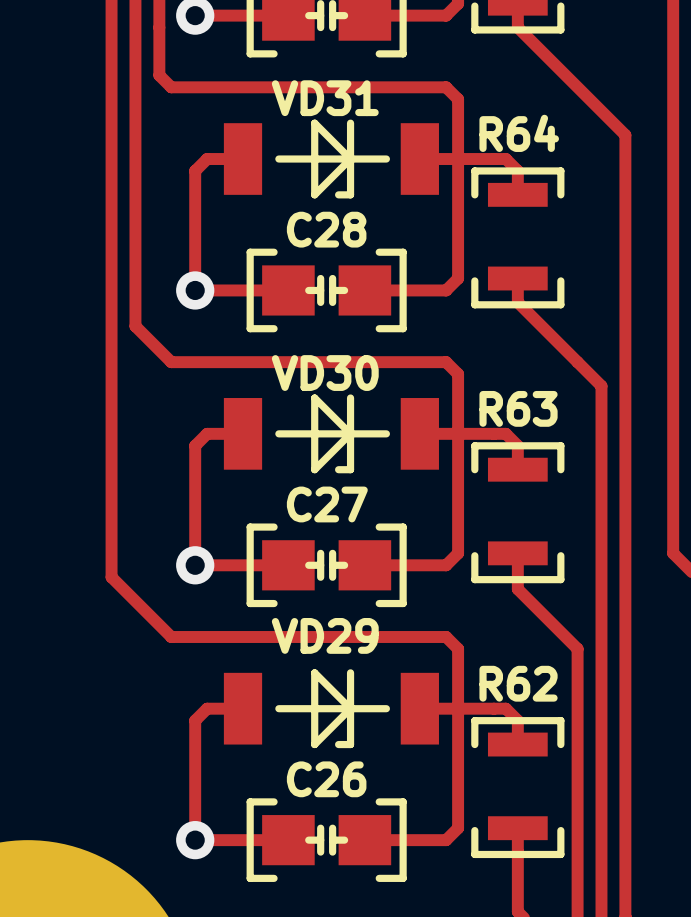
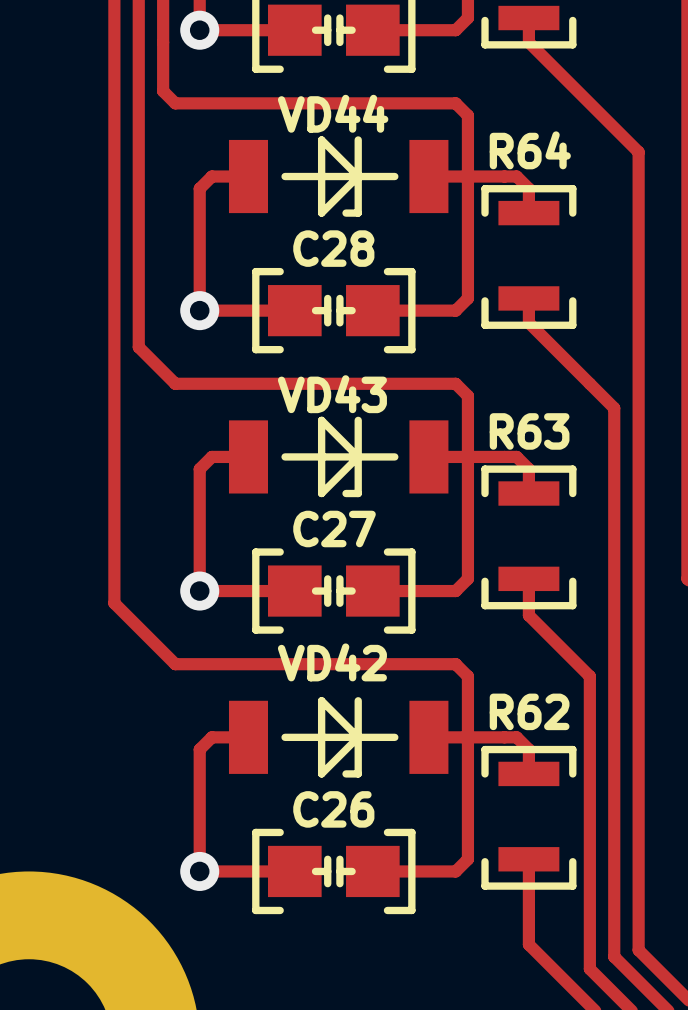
VD31 name: VD31 (325, 98) -> VD44 (333, 113)
VD30 name: VD30 (325, 373) -> VD43 (332, 394)
VD29 name: VD29 (325, 635) -> VD42 (332, 662)

